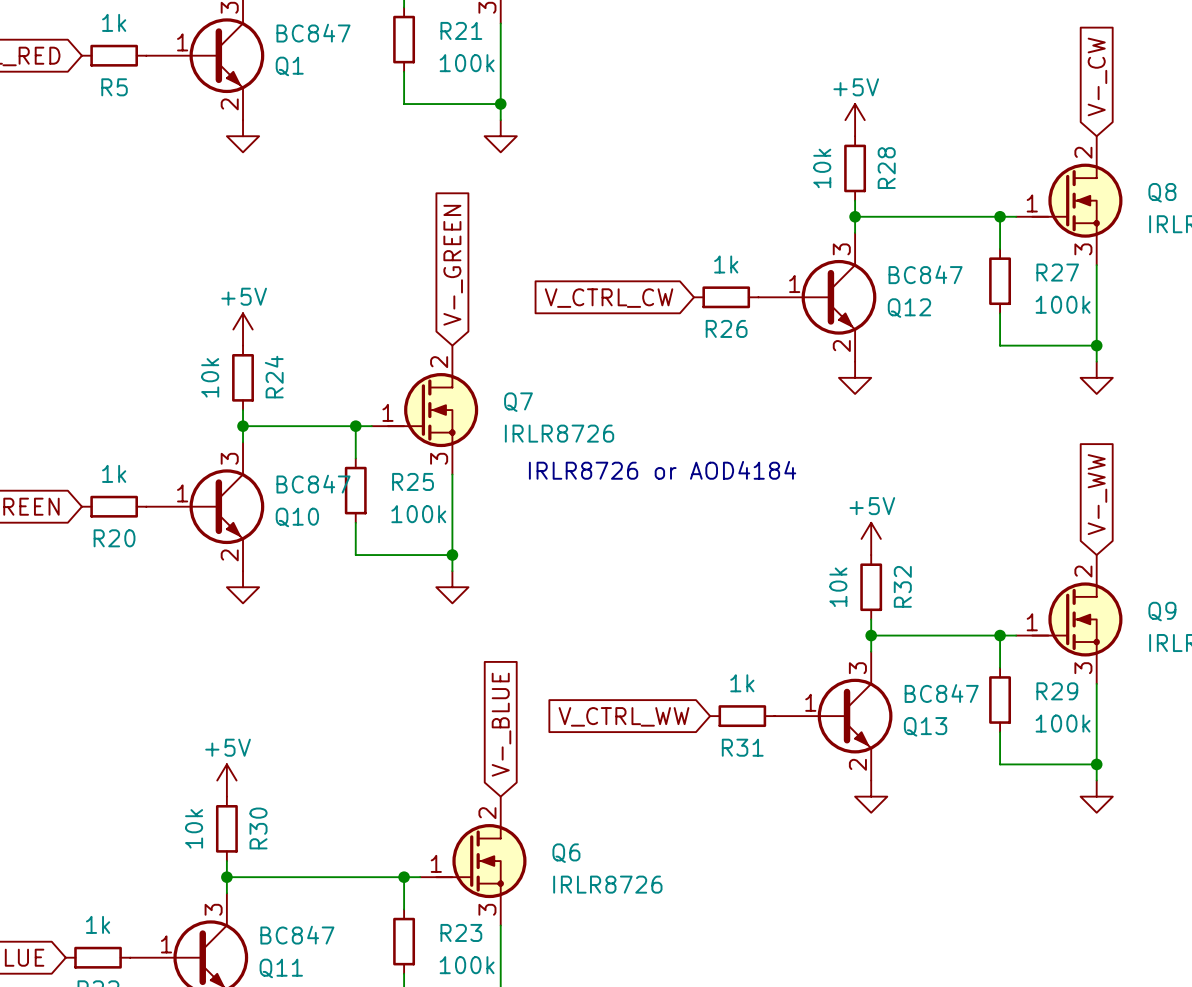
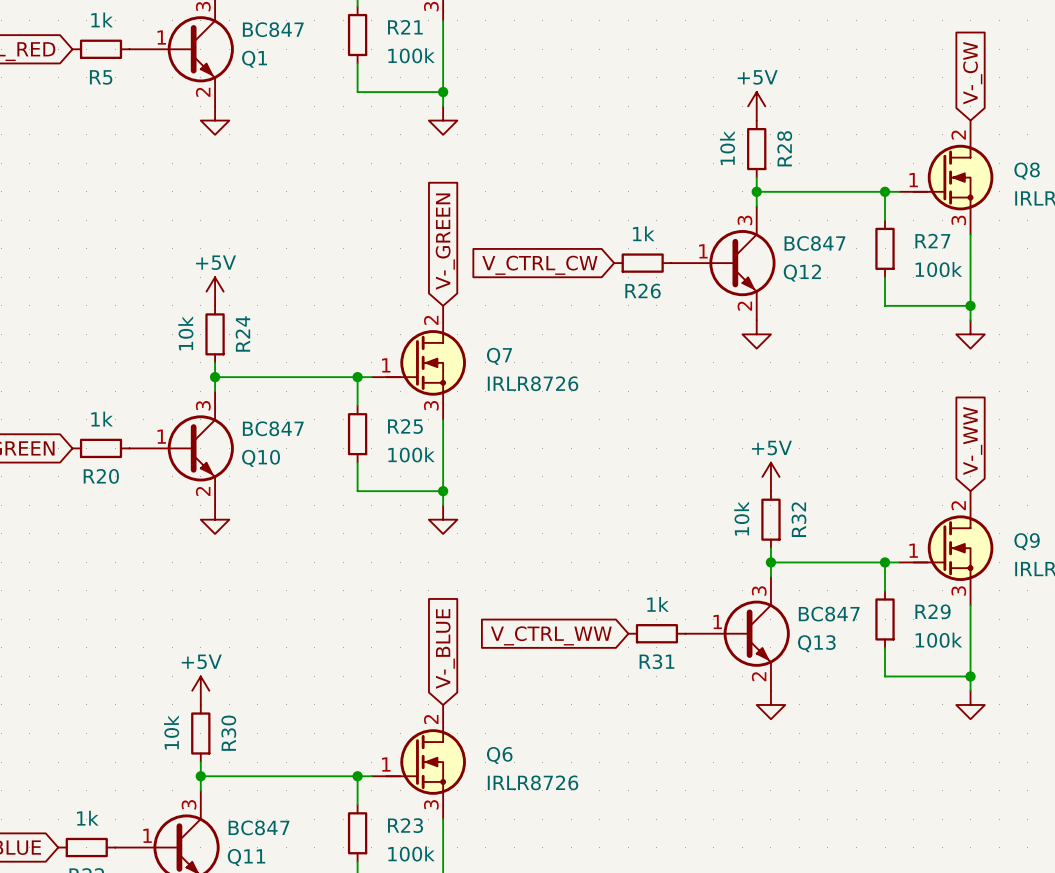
global label position: V-_GREEN (453, 265) -> V-_GREEN (445, 241)
Q7 position: (425, 410) -> (418, 362)
wire: (355, 426) (355, 458) -> (357, 377) (357, 405)
junction position: (355, 426) -> (357, 377)
text: IRLR8726 or AOD4184 (662, 470) -> none
wire: (452, 474) (452, 571) -> (443, 419) (443, 505)
R25 position: (355, 490) -> (357, 434)
wire: (355, 522) (355, 555) (404, 555) -> (357, 462) (357, 491)
wire: none -> (400, 491) (443, 491)
junction position: (452, 555) -> (443, 491)
power symbol position: (452, 587) -> (443, 519)

